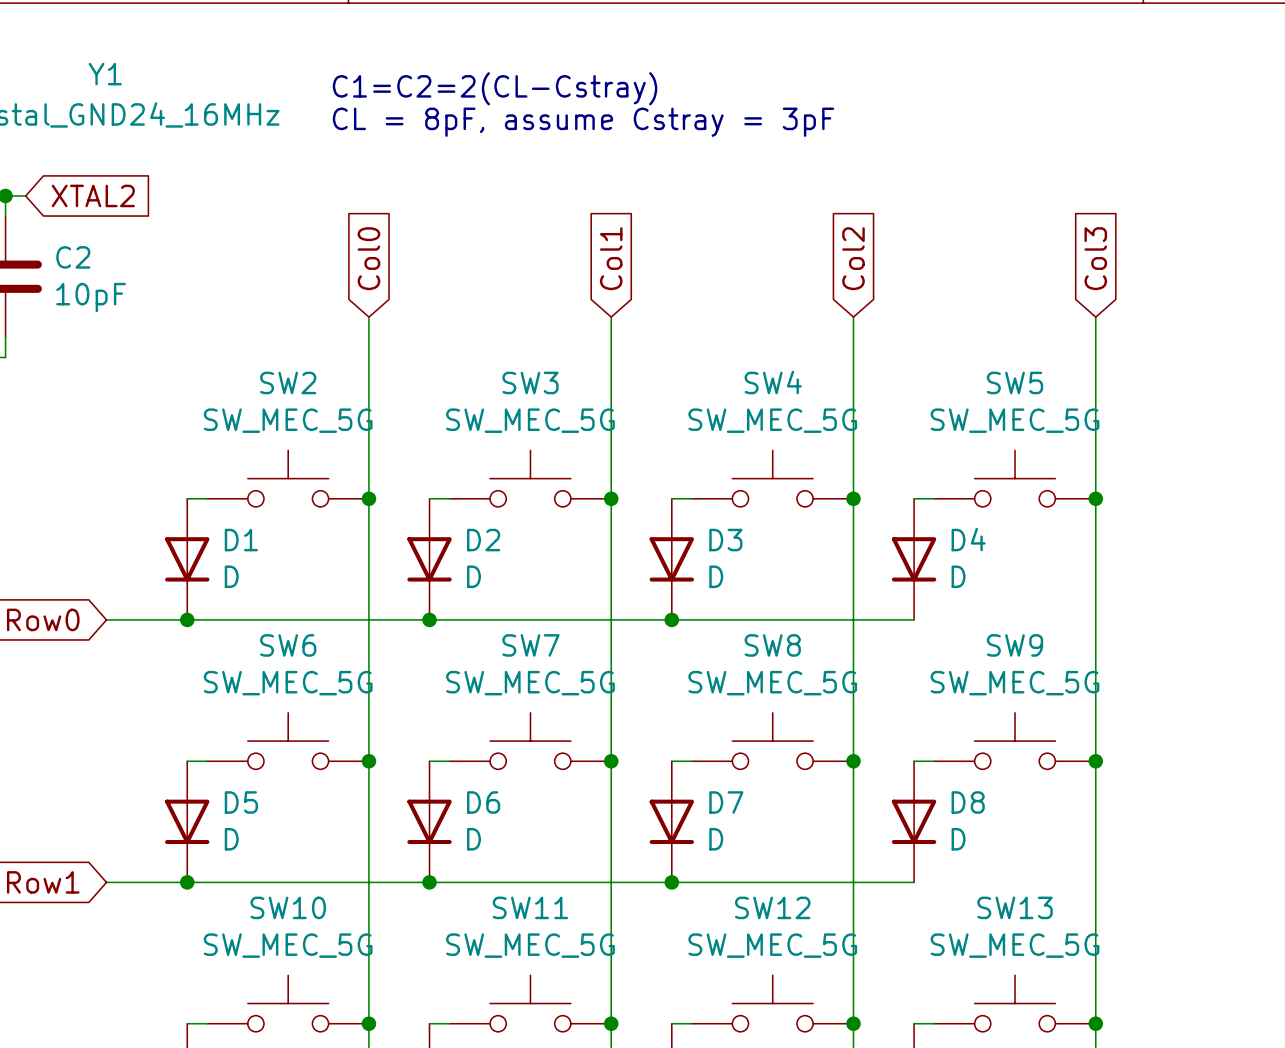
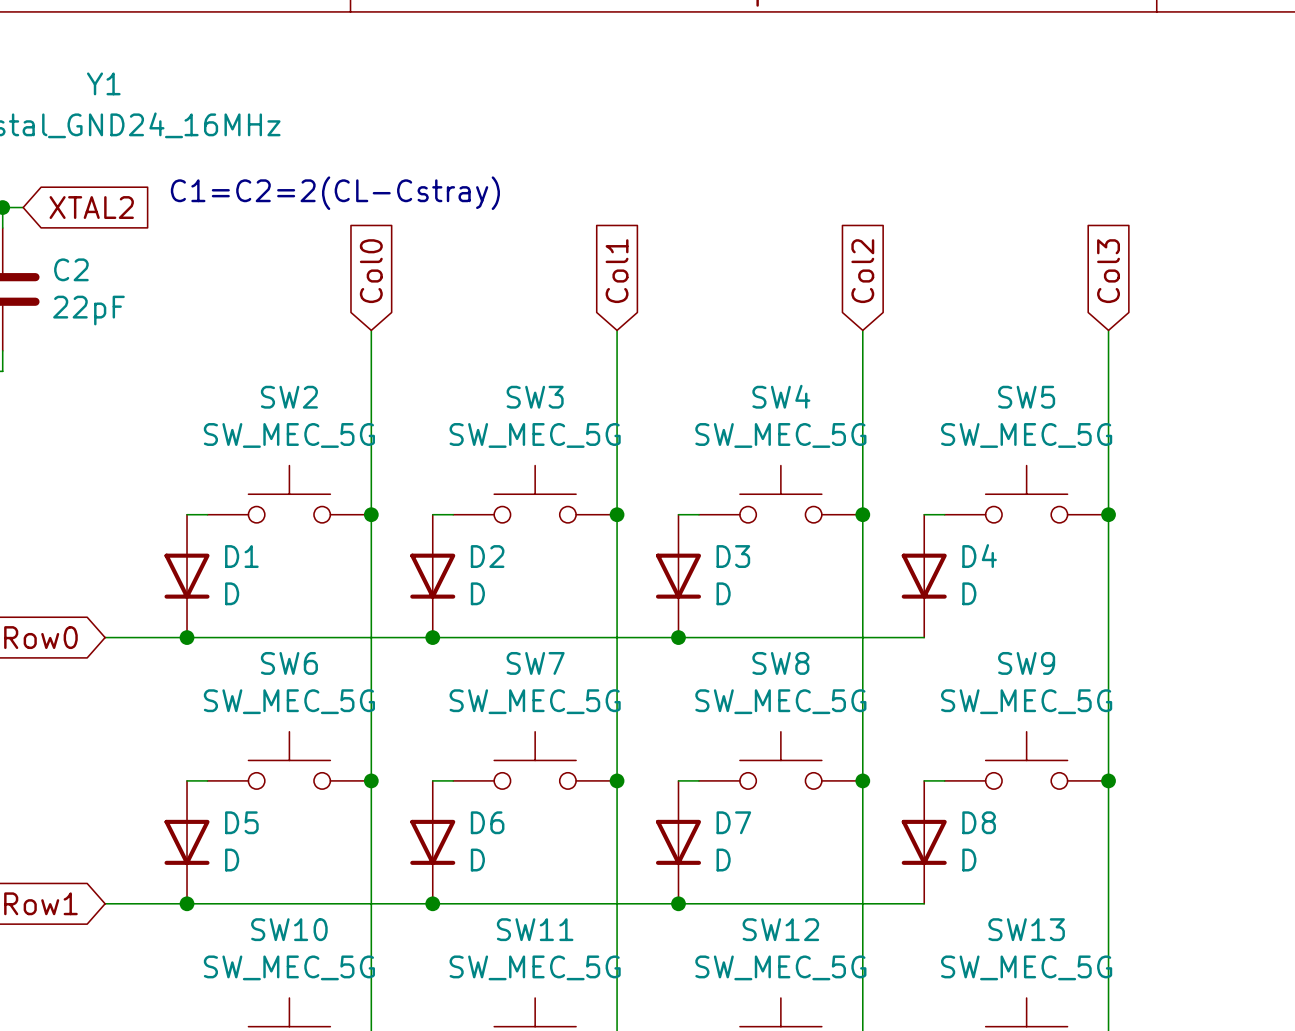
text position: C1=C2=2(CL-Cstray) (495, 88) -> C1=C2=2(CL-Cstray) (335, 193)
text: CL = 8pF, assume Cstray = 3pF (583, 122) -> none
C2 value: 10pF (91, 297) -> 22pF (88, 310)

